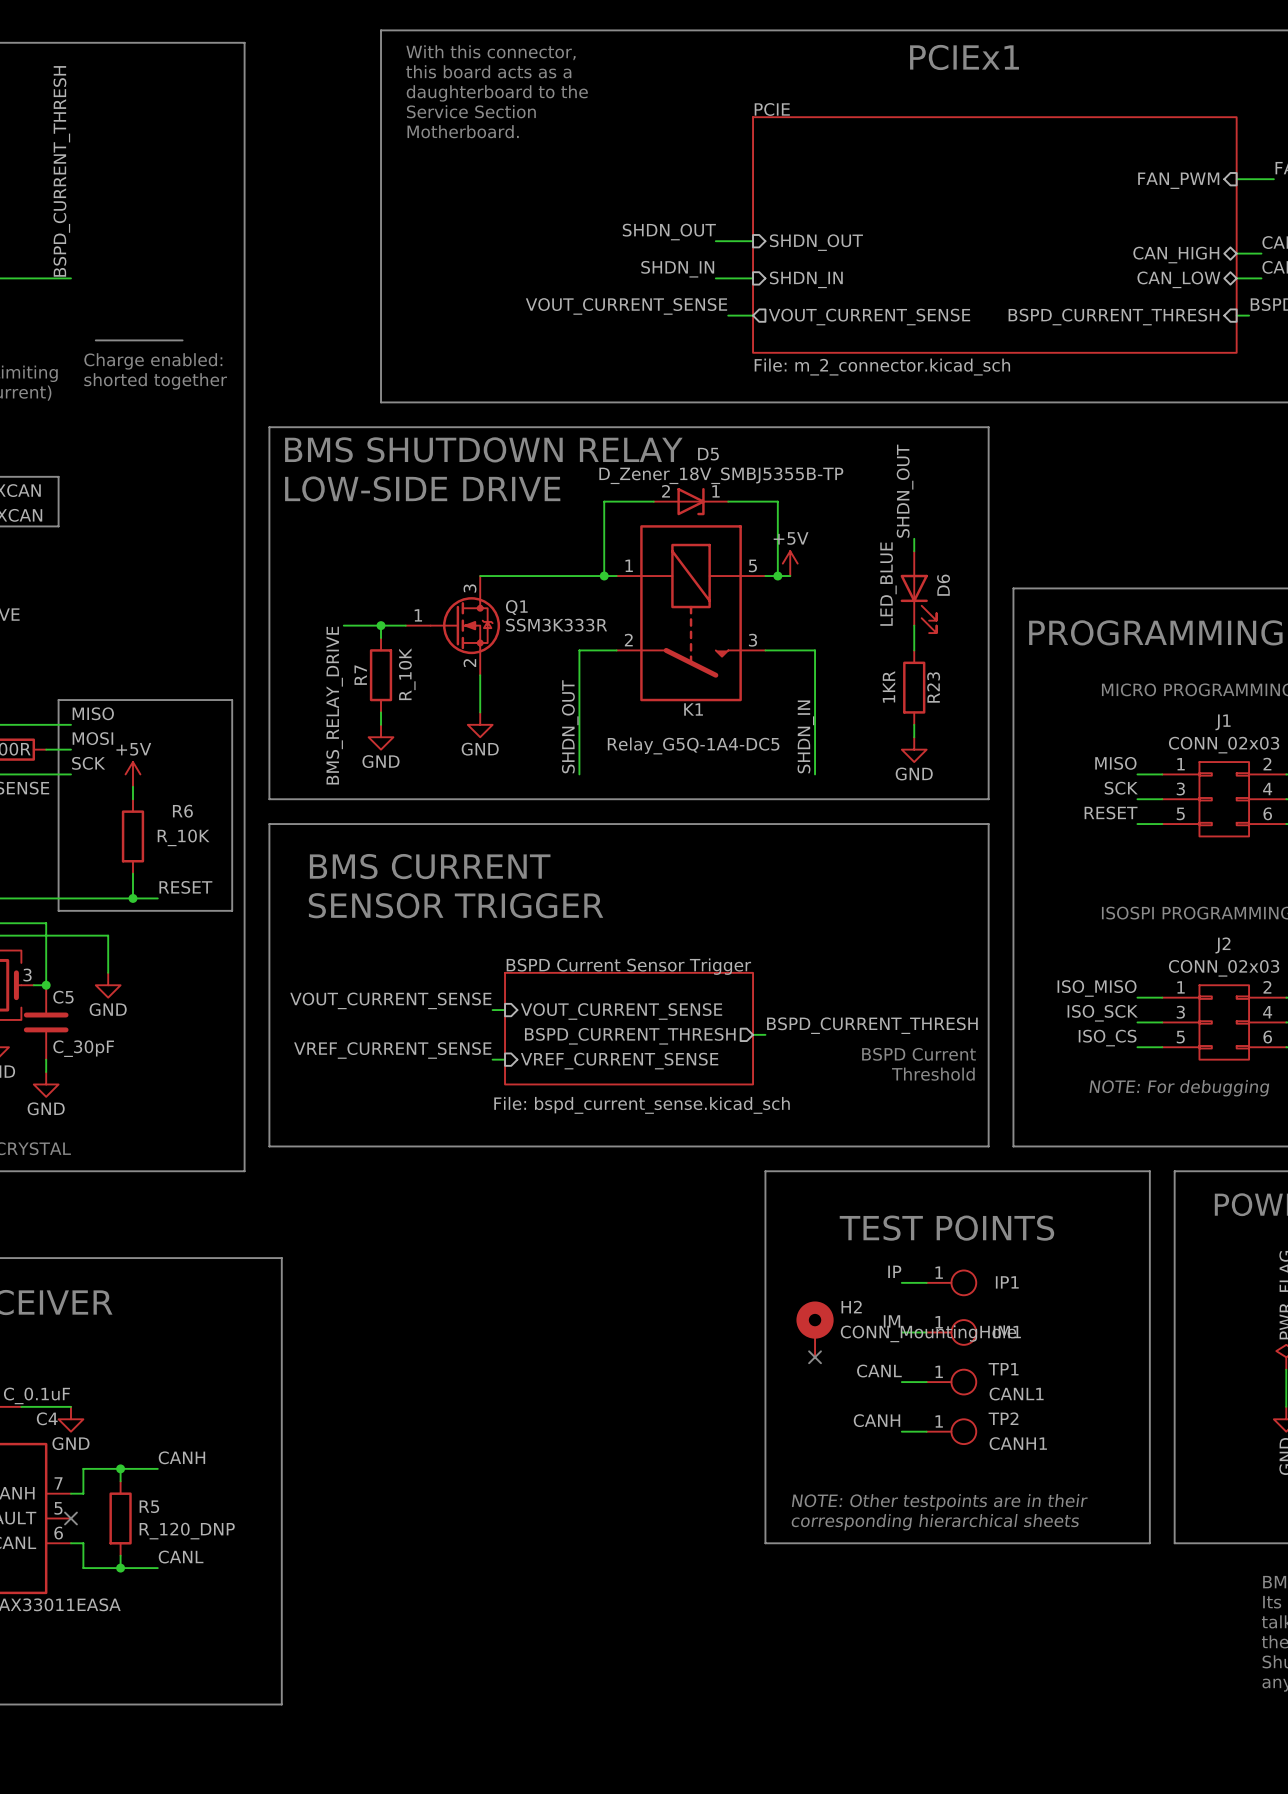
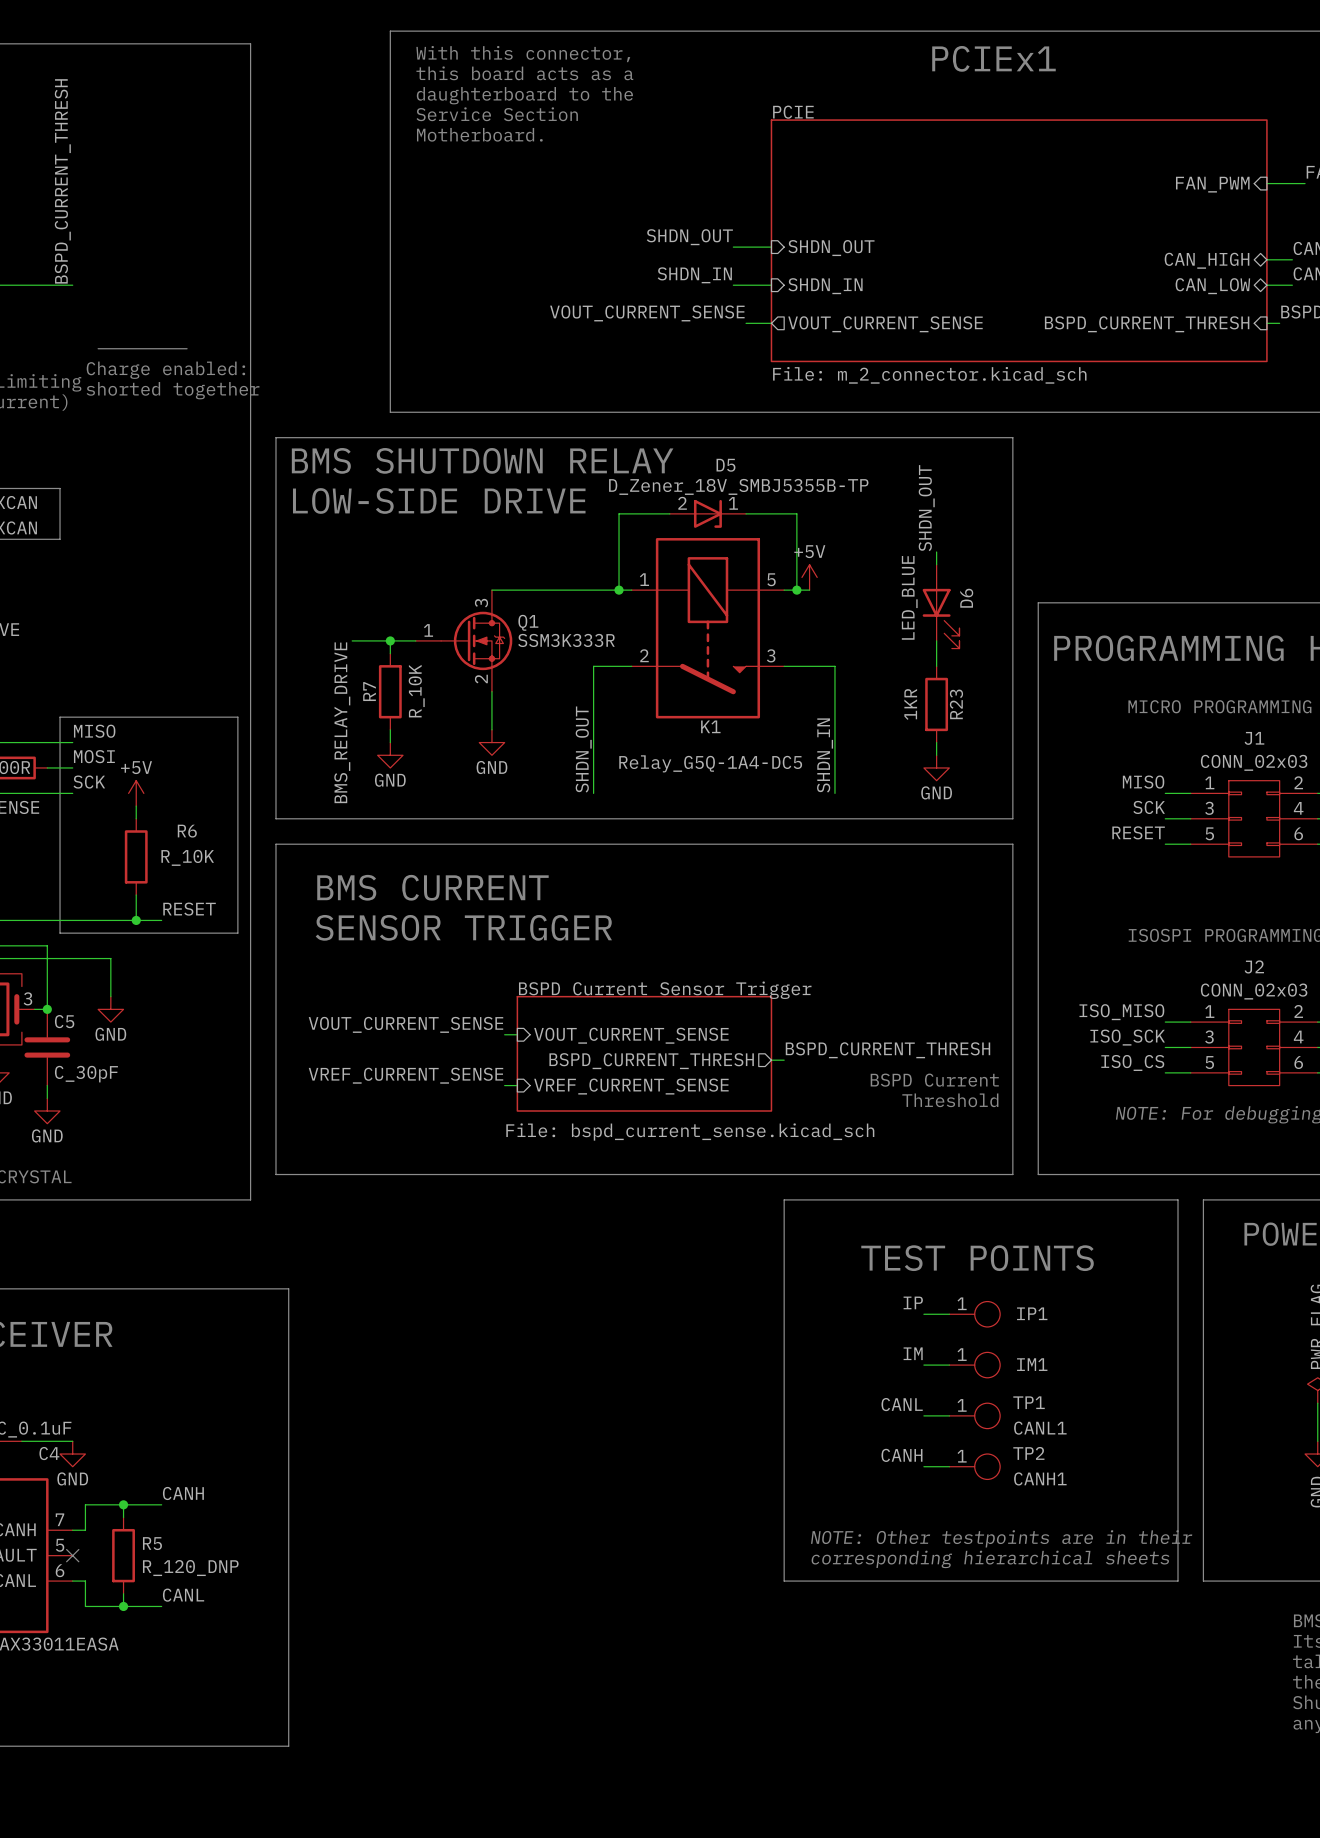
H2: CONN_MountingHole (815, 1329) -> none
no-connect mark: (815, 1357) -> none

